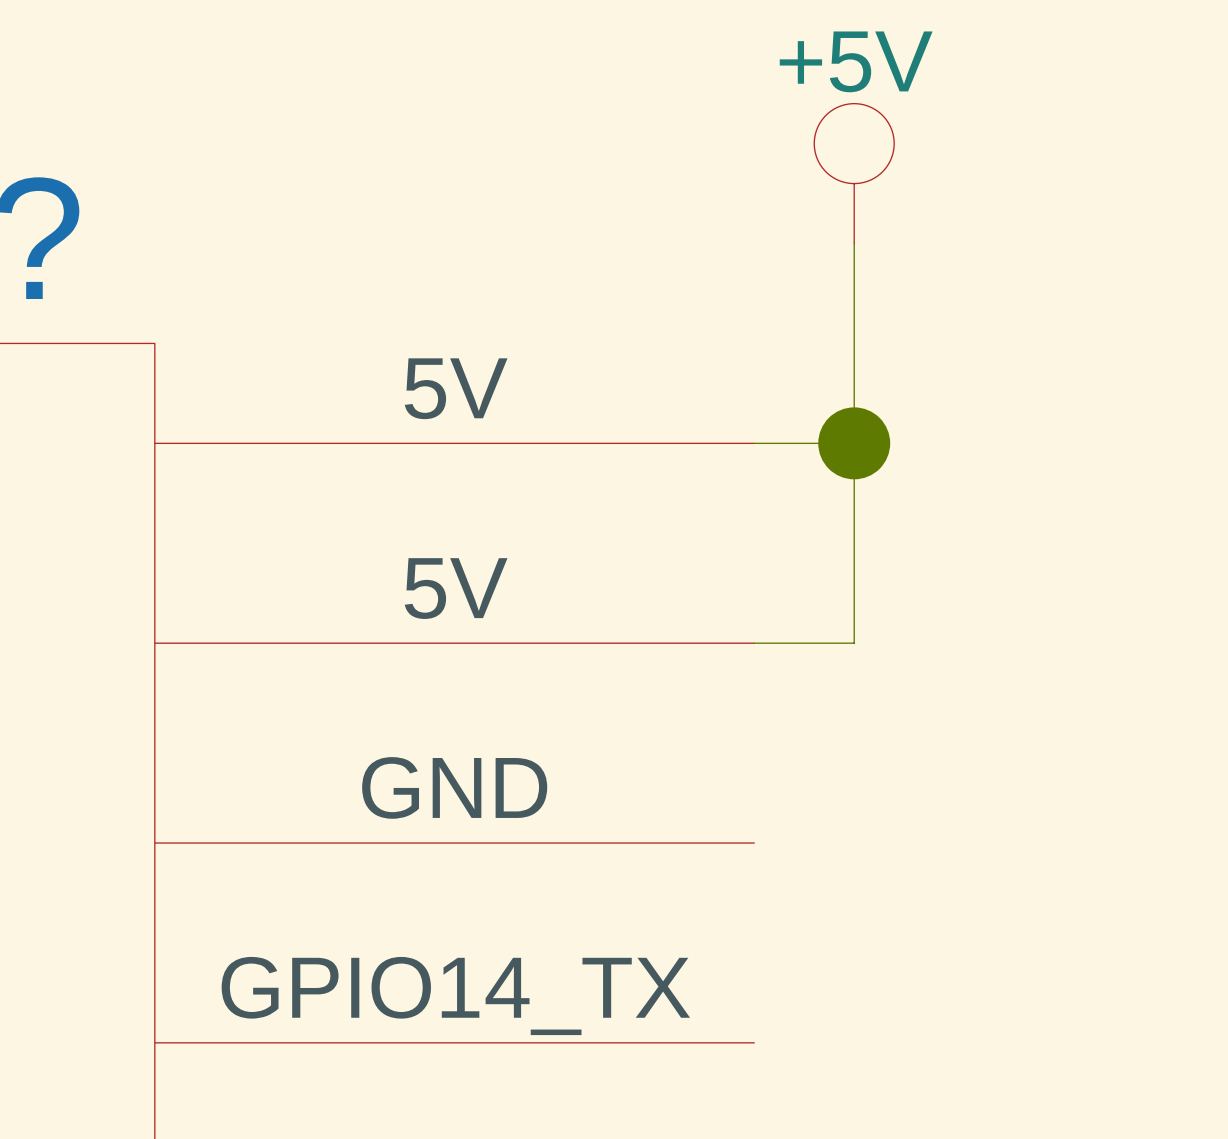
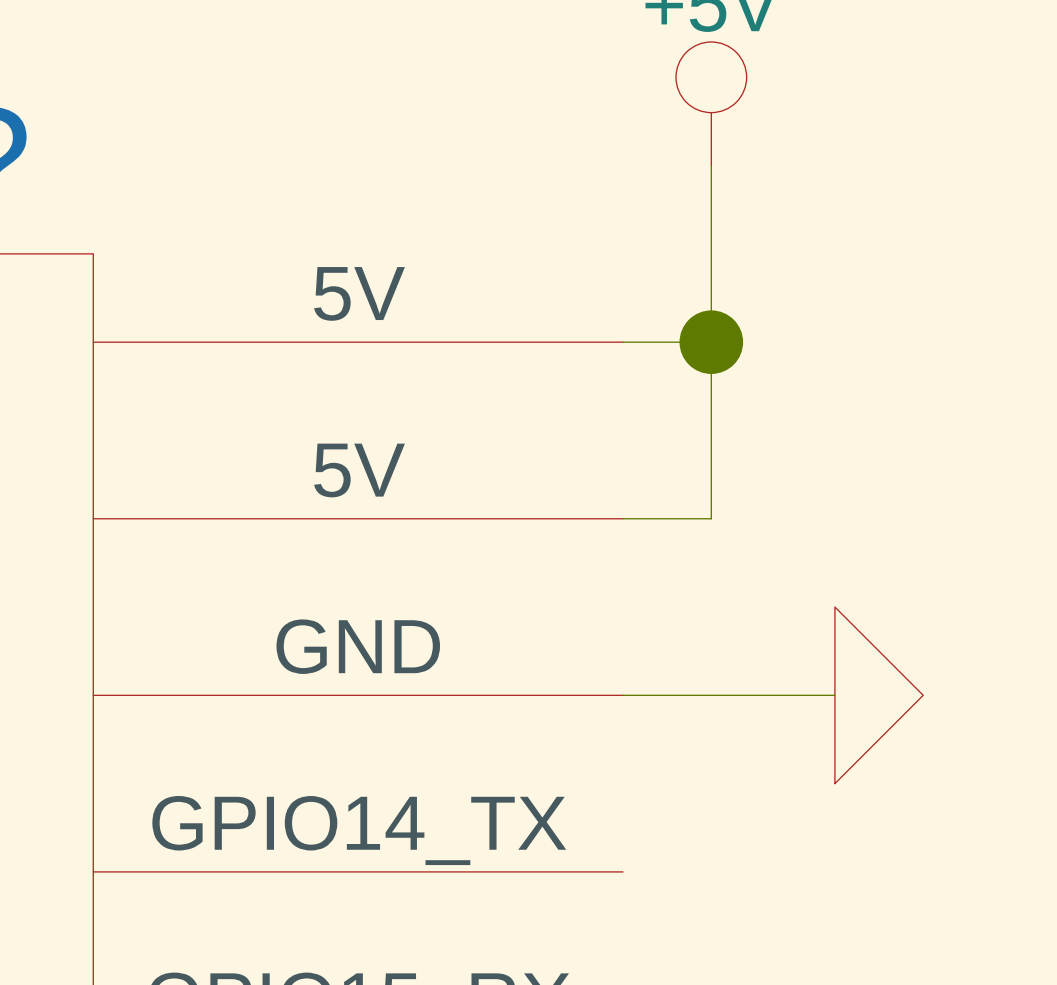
wire: none -> (623, 695) (834, 695)
power symbol: none -> (879, 695)

